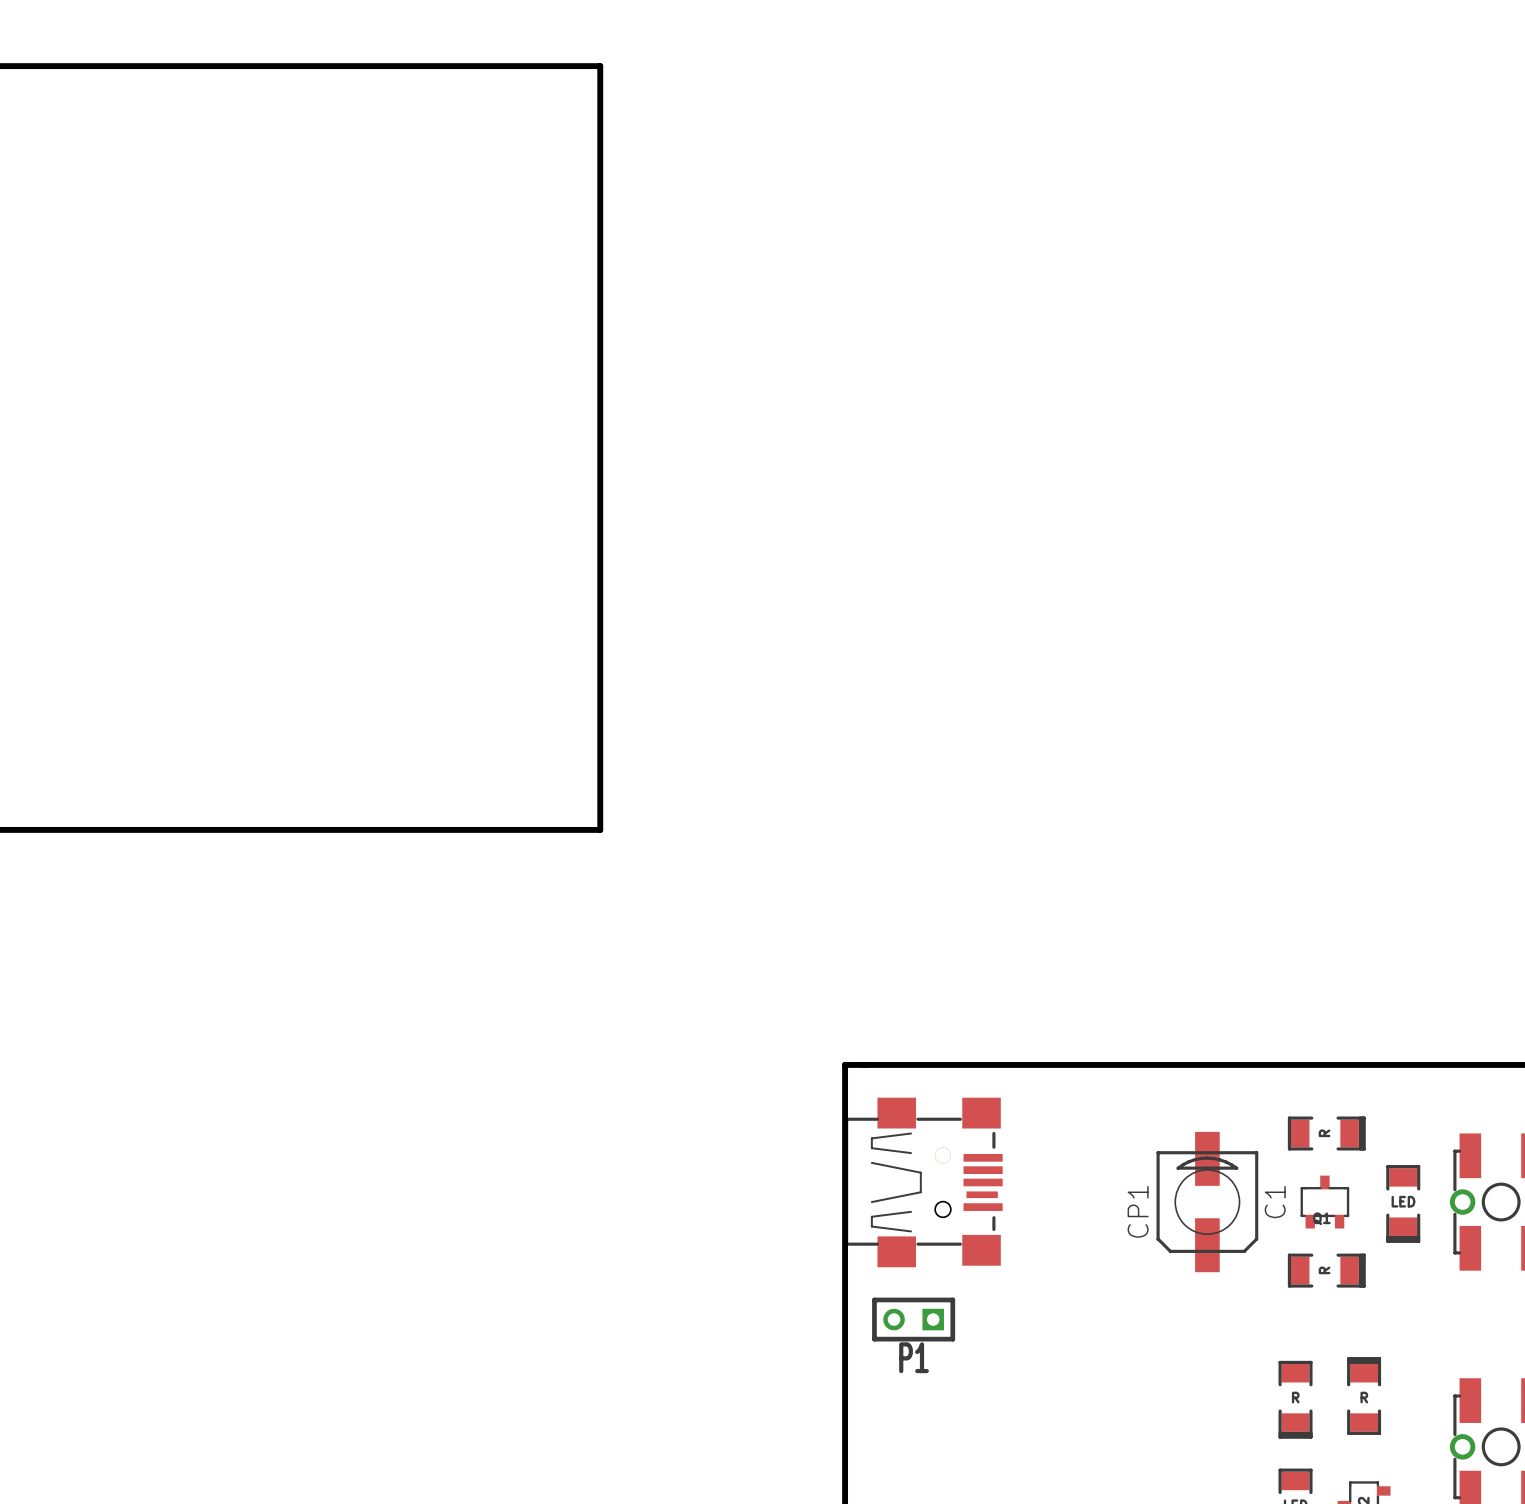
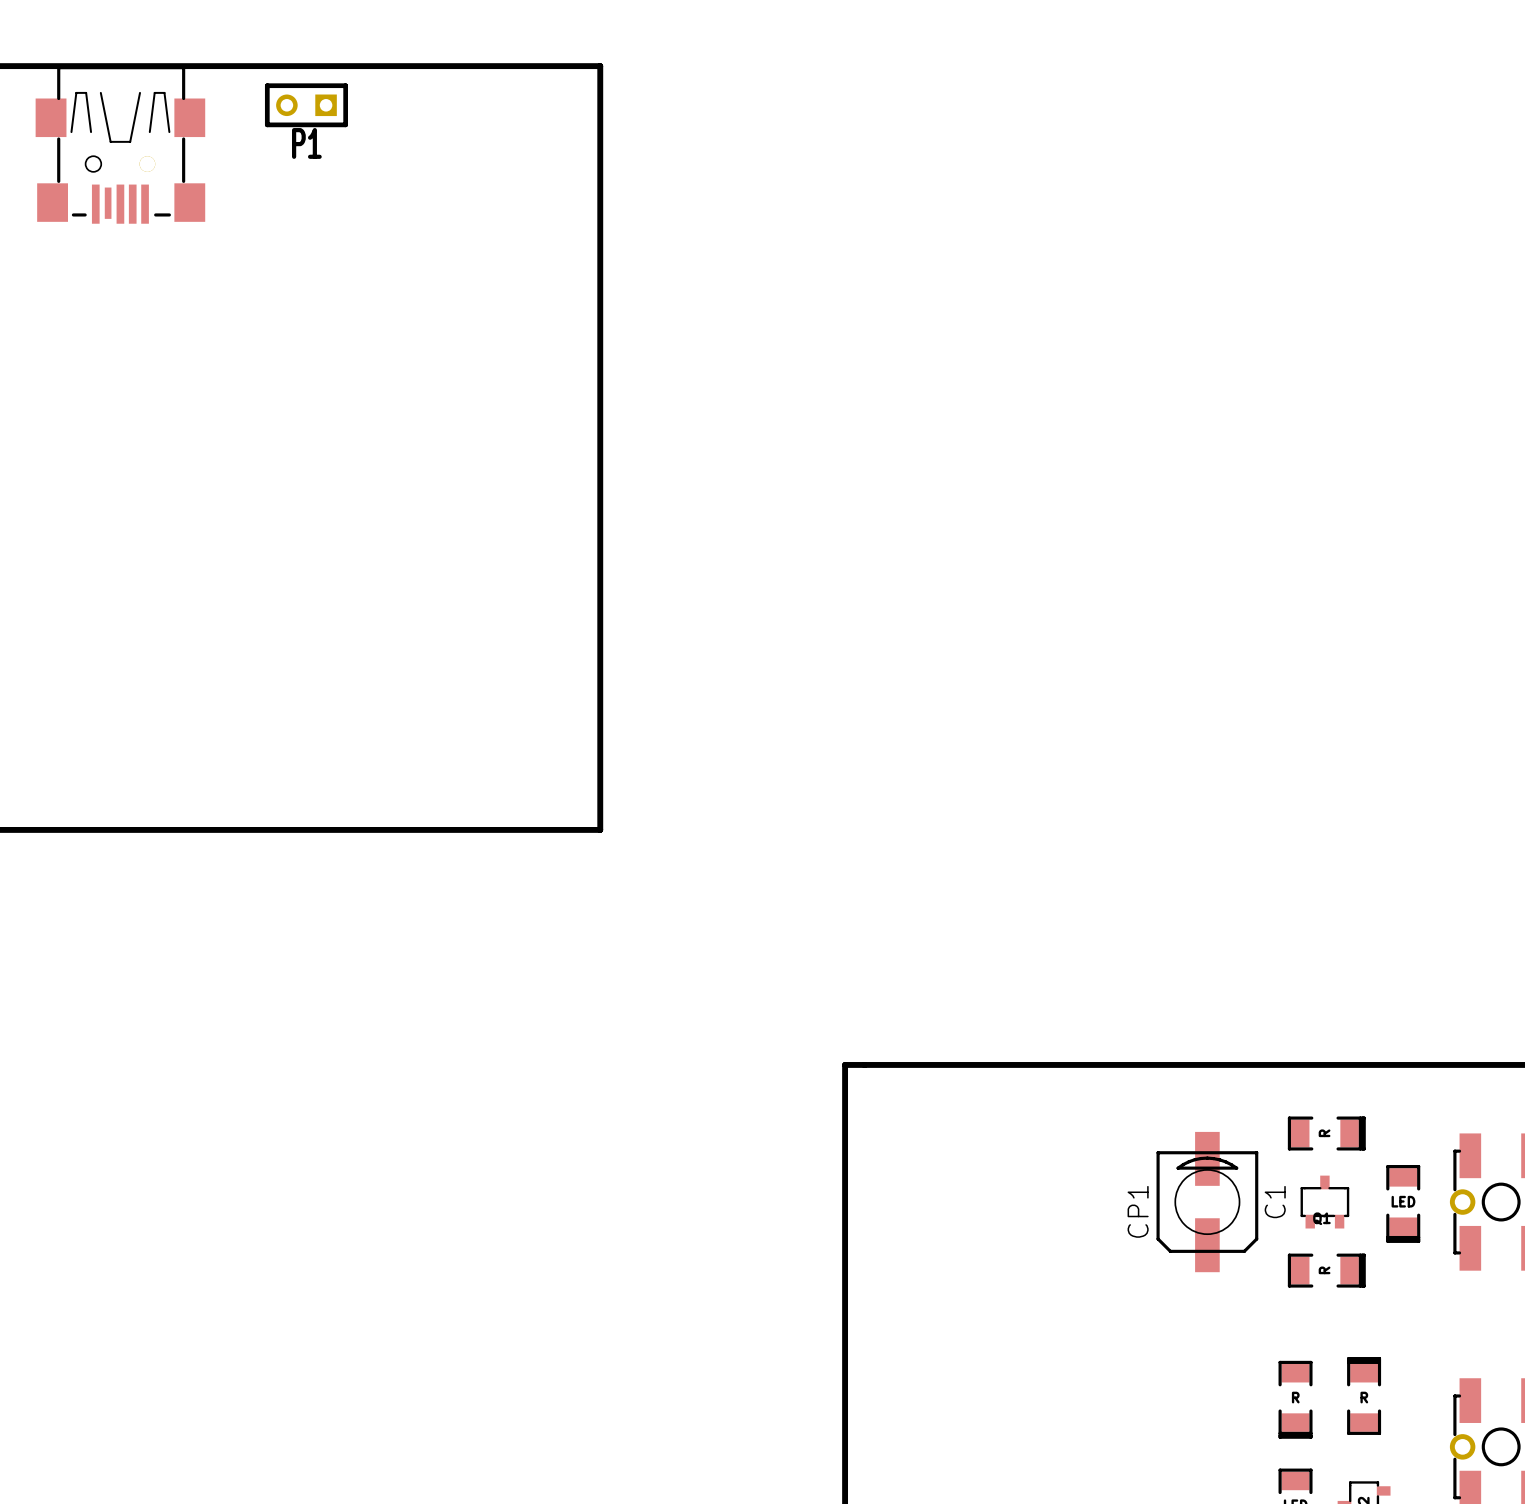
part: none -> (120, 144)
part: (923, 1182) -> none
P1 position: (913, 1319) -> (306, 105)

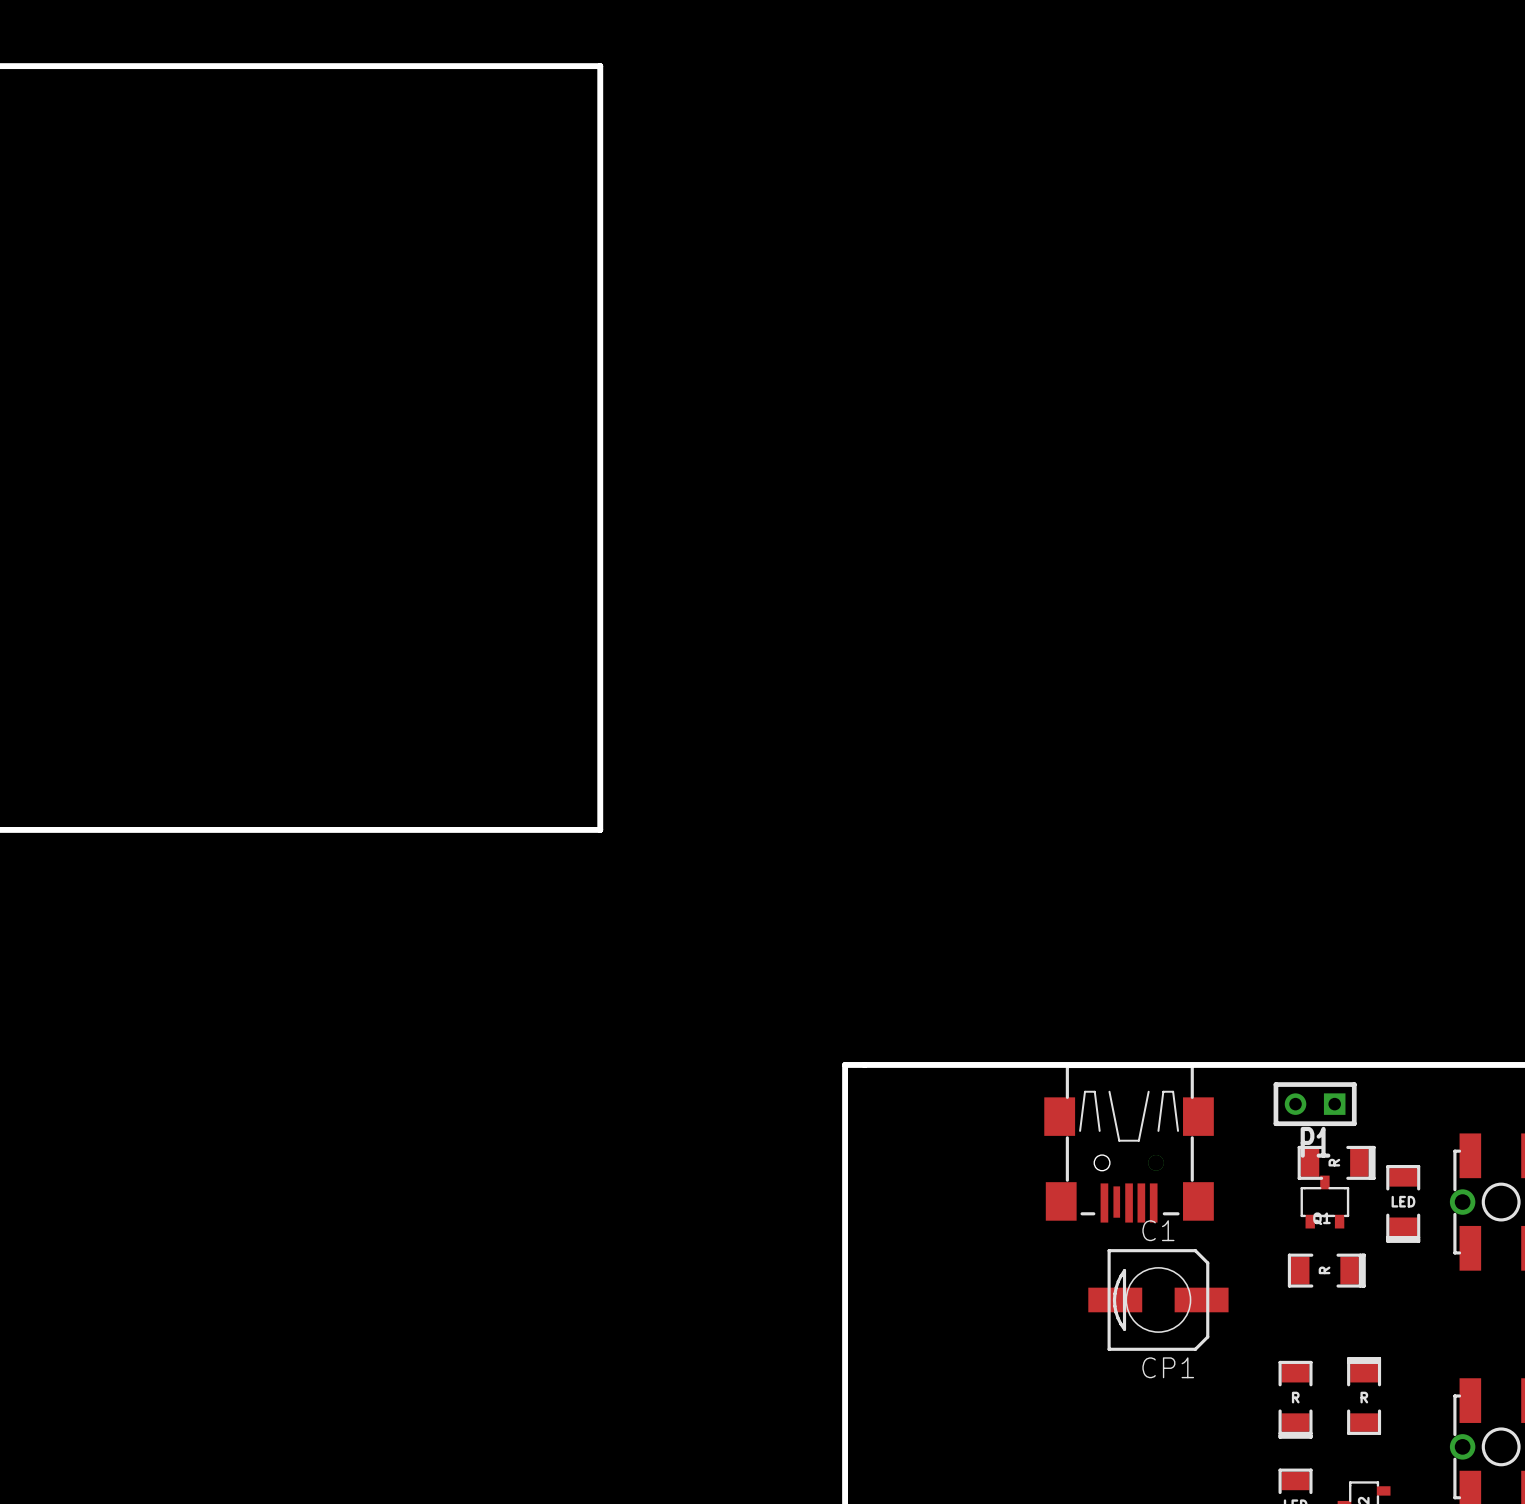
P1 position: (306, 105) -> (1315, 1104)
part: (120, 144) -> none
part position: (1326, 1133) -> (1336, 1162)
part: none -> (1129, 1143)
C1 rotation: 0° (1207, 1202) -> 90° counterclockwise (1158, 1299)
C1 position: (1207, 1202) -> (1158, 1299)

